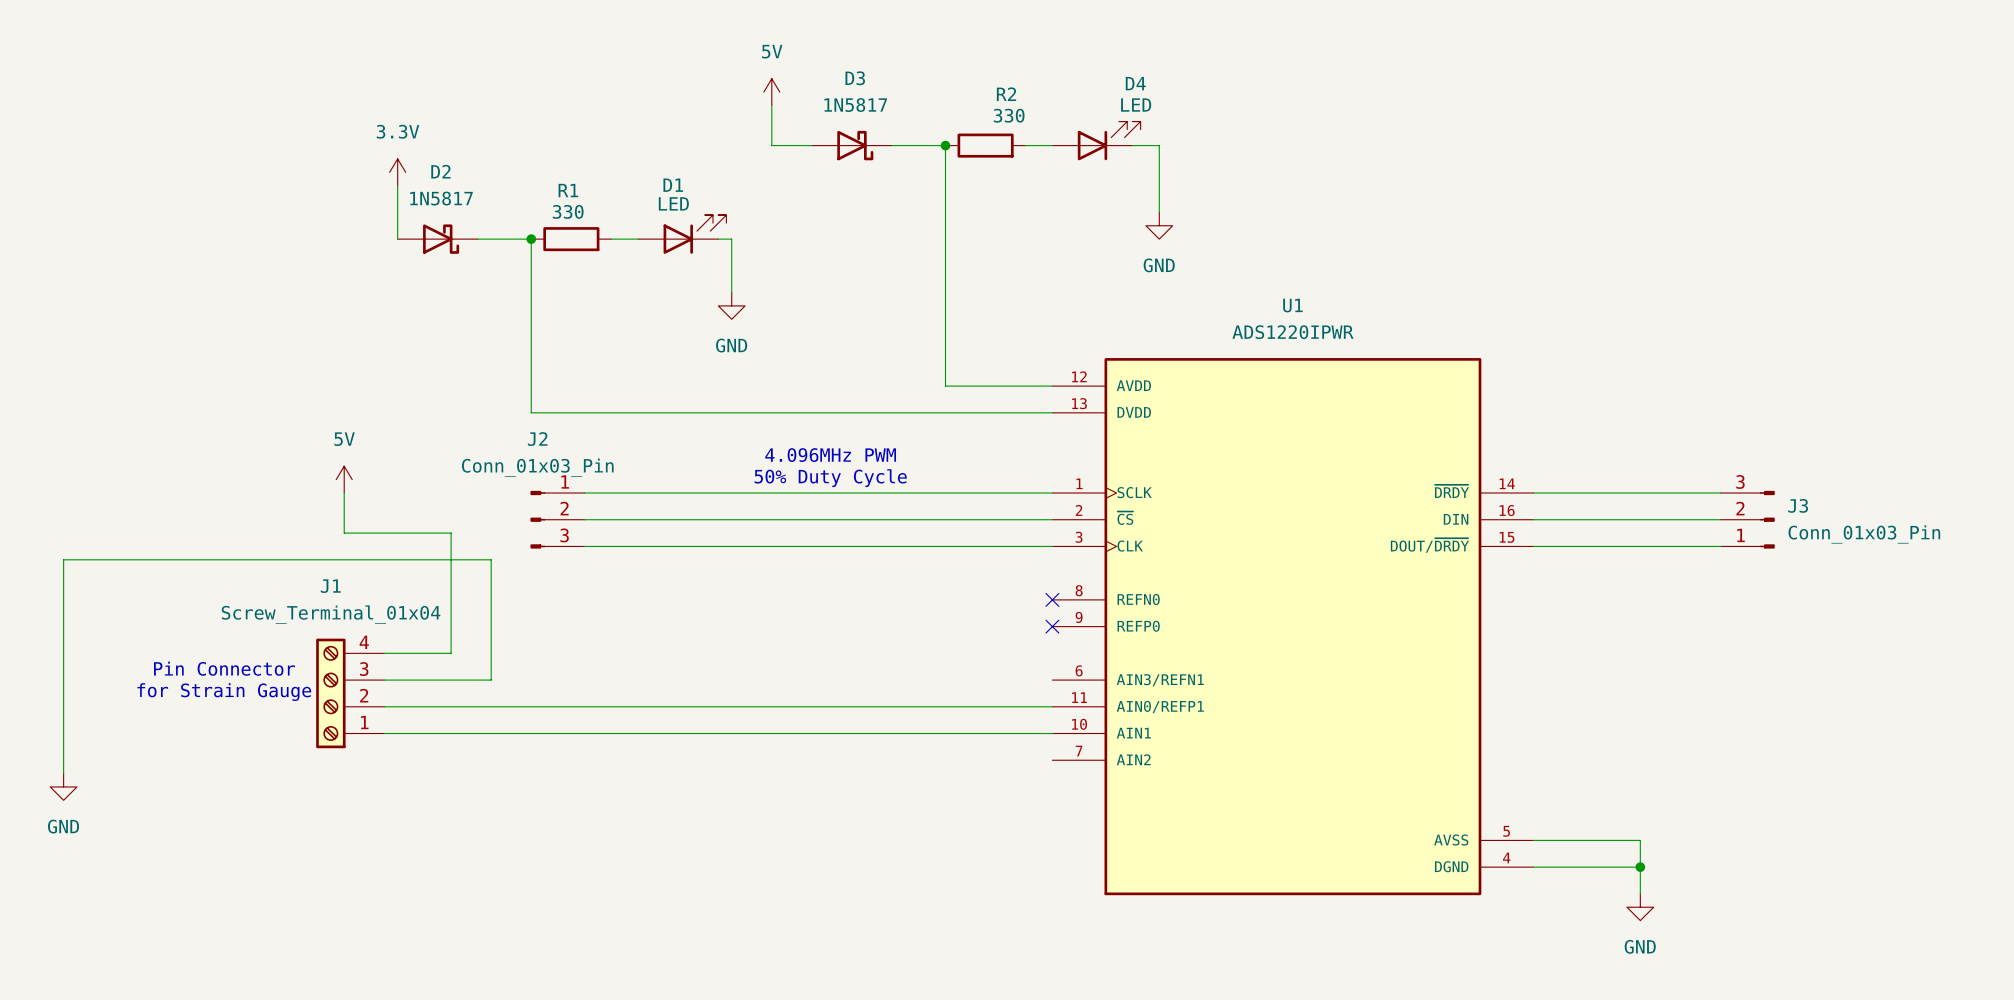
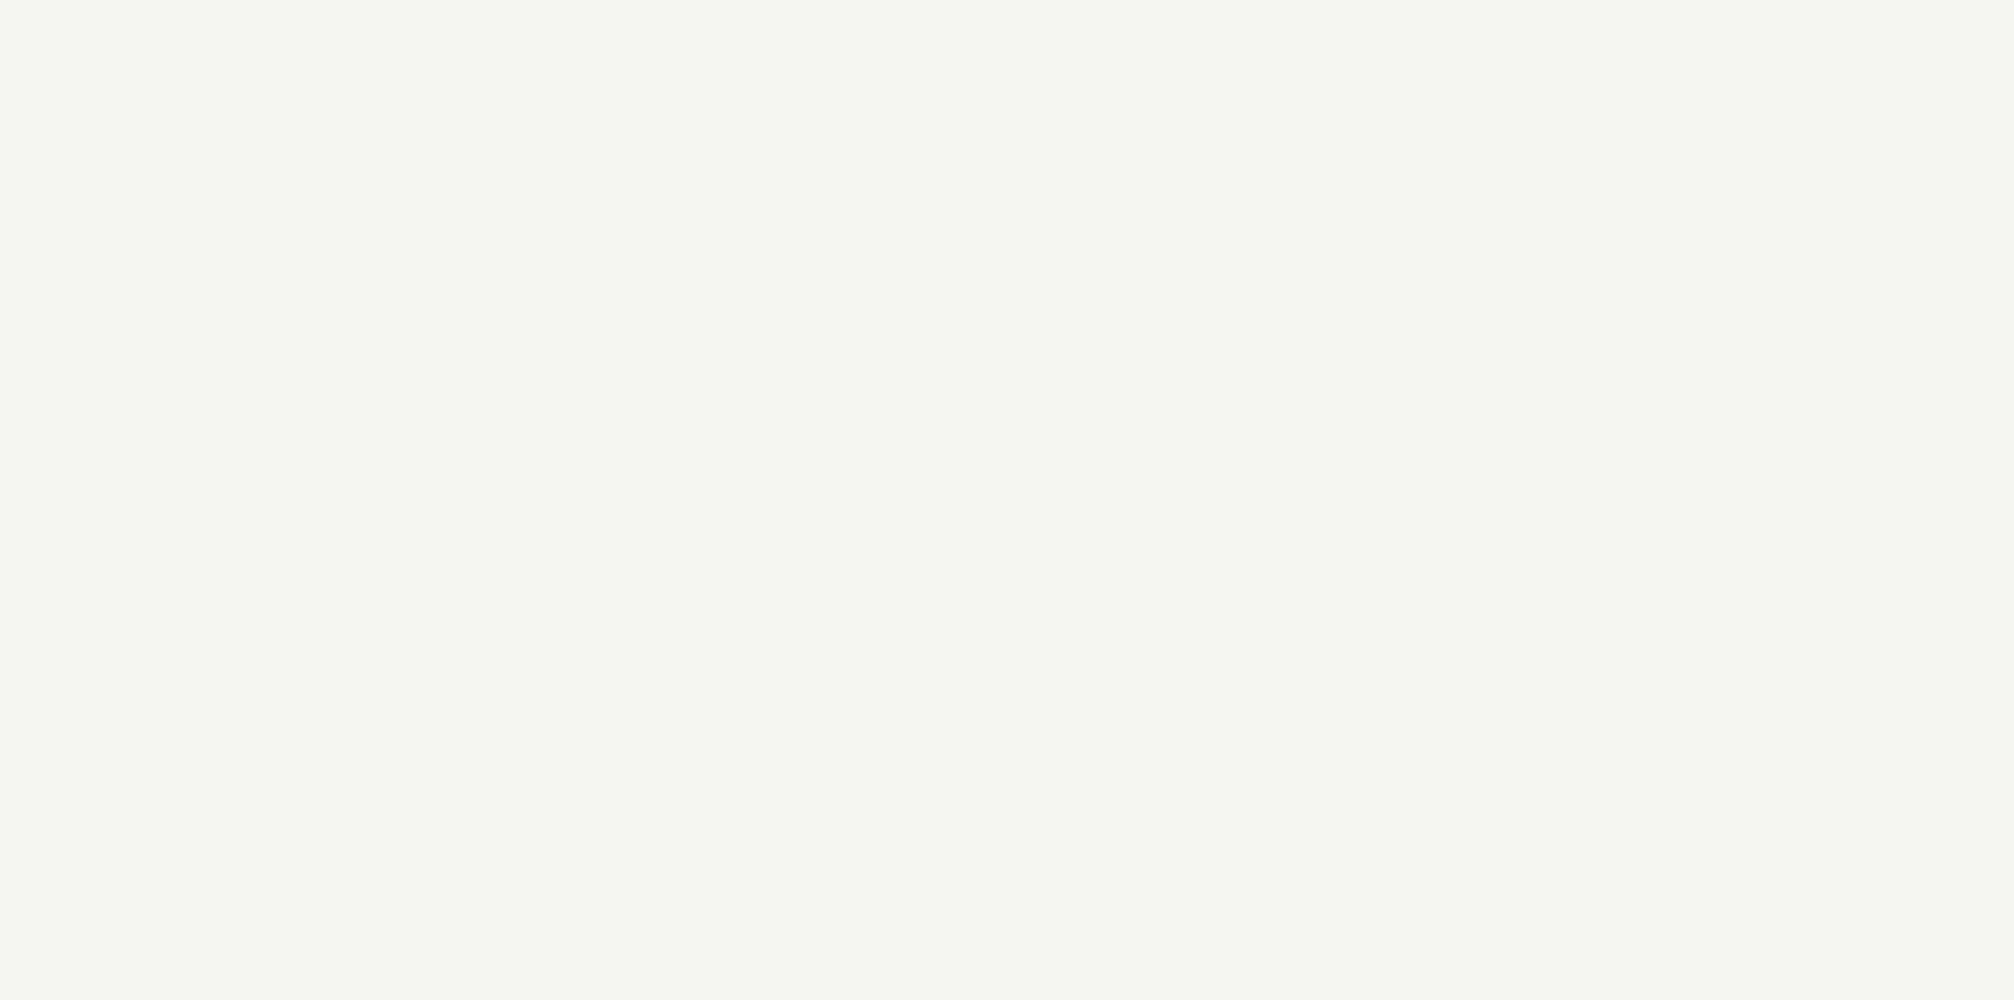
power symbol: 5V (771, 92) -> none
wire: (771, 105) (771, 145) (811, 145) -> none
D4: LED (1096, 140) -> none
D3: 1N5817 (851, 145) -> none
wire: (892, 145) (945, 145) (945, 386) (1052, 386) -> none
junction: (945, 145) -> none
R2: 330 (985, 145) -> none
wire: (1025, 145) (1052, 145) -> none
wire: (1132, 145) (1159, 145) (1159, 212) -> none
power symbol: 3.3V (397, 172) -> none
wire: (397, 185) (397, 239) -> none
power symbol: GND (1159, 225) -> none
D1: LED (682, 234) -> none
D2: 1N5817 (437, 239) -> none
wire: (477, 239) (531, 239) (531, 412) (1052, 412) -> none
junction: (531, 239) -> none
R1: 330 (571, 239) -> none
wire: (611, 239) (638, 239) -> none
wire: (718, 239) (731, 239) (731, 292) -> none
power symbol: GND (731, 305) -> none
text: 4.096MHz PWM (830, 455) -> none
text: 50% Duty Cycle (830, 478) -> none
power symbol: 5V (344, 479) -> none
wire: (344, 493) (344, 533) (451, 533) (451, 653) (384, 653) -> none
wire: (584, 493) (1052, 493) -> none
wire: (1533, 493) (1720, 493) -> none
J2: Conn_01x03_Pin (557, 519) -> none
wire: (584, 519) (1052, 519) -> none
wire: (1533, 519) (1720, 519) -> none
J3: Conn_01x03_Pin (1747, 519) -> none
wire: (584, 546) (1052, 546) -> none
wire: (1533, 546) (1720, 546) -> none
no-connect mark: (1052, 599) -> none
no-connect mark: (1052, 626) -> none
U1: ADS1220IPWR (1292, 626) -> none
text: Pin Connector (224, 668) -> none
wire: (384, 680) (491, 680) (491, 559) (63, 559) (63, 773) -> none
text: for Strain Gauge (224, 692) -> none
J1: Screw_Terminal_01x04 (350, 693) -> none
wire: (384, 706) (1052, 706) -> none
wire: (384, 733) (1052, 733) -> none
power symbol: GND (63, 786) -> none
wire: (1533, 840) (1640, 840) (1640, 893) -> none
wire: (1533, 867) (1640, 867) -> none
junction: (1640, 867) -> none
power symbol: GND (1640, 907) -> none

